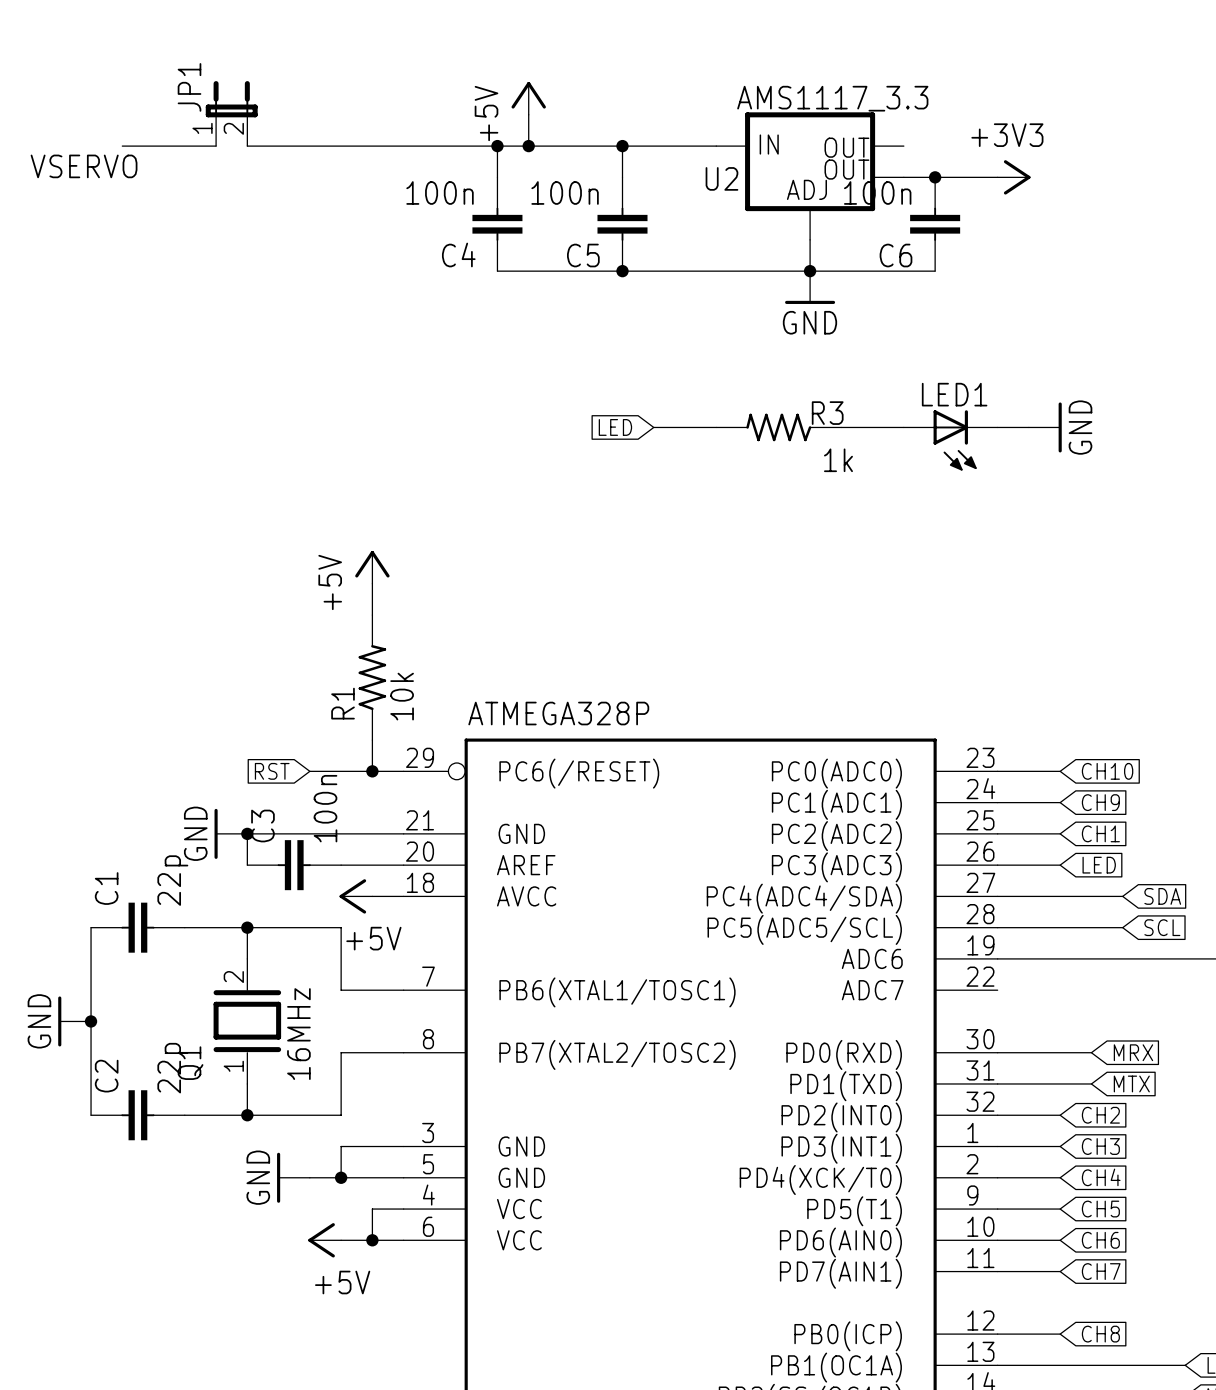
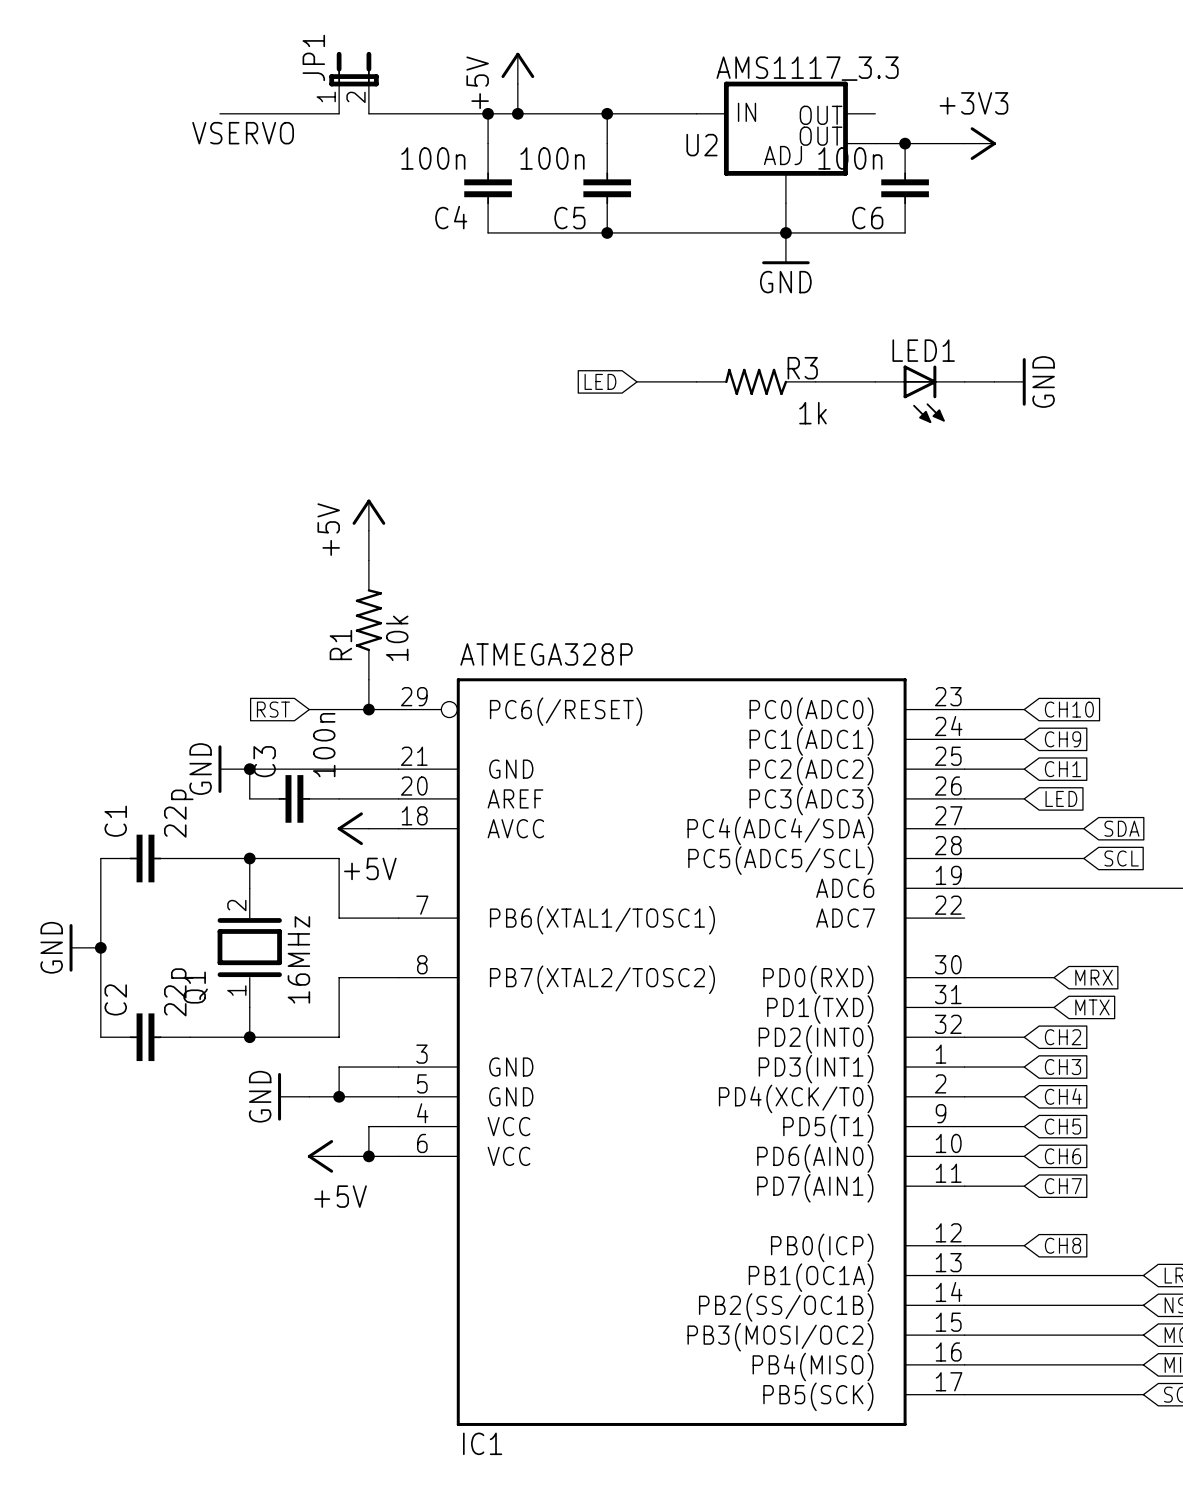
JP1 position: (231, 113) -> (354, 82)
wire: (122, 146) (216, 146) -> (249, 113) (219, 113)
wire: (341, 146) (372, 146) -> none
label position: VSERVO (84, 166) -> VSERVO (243, 133)

